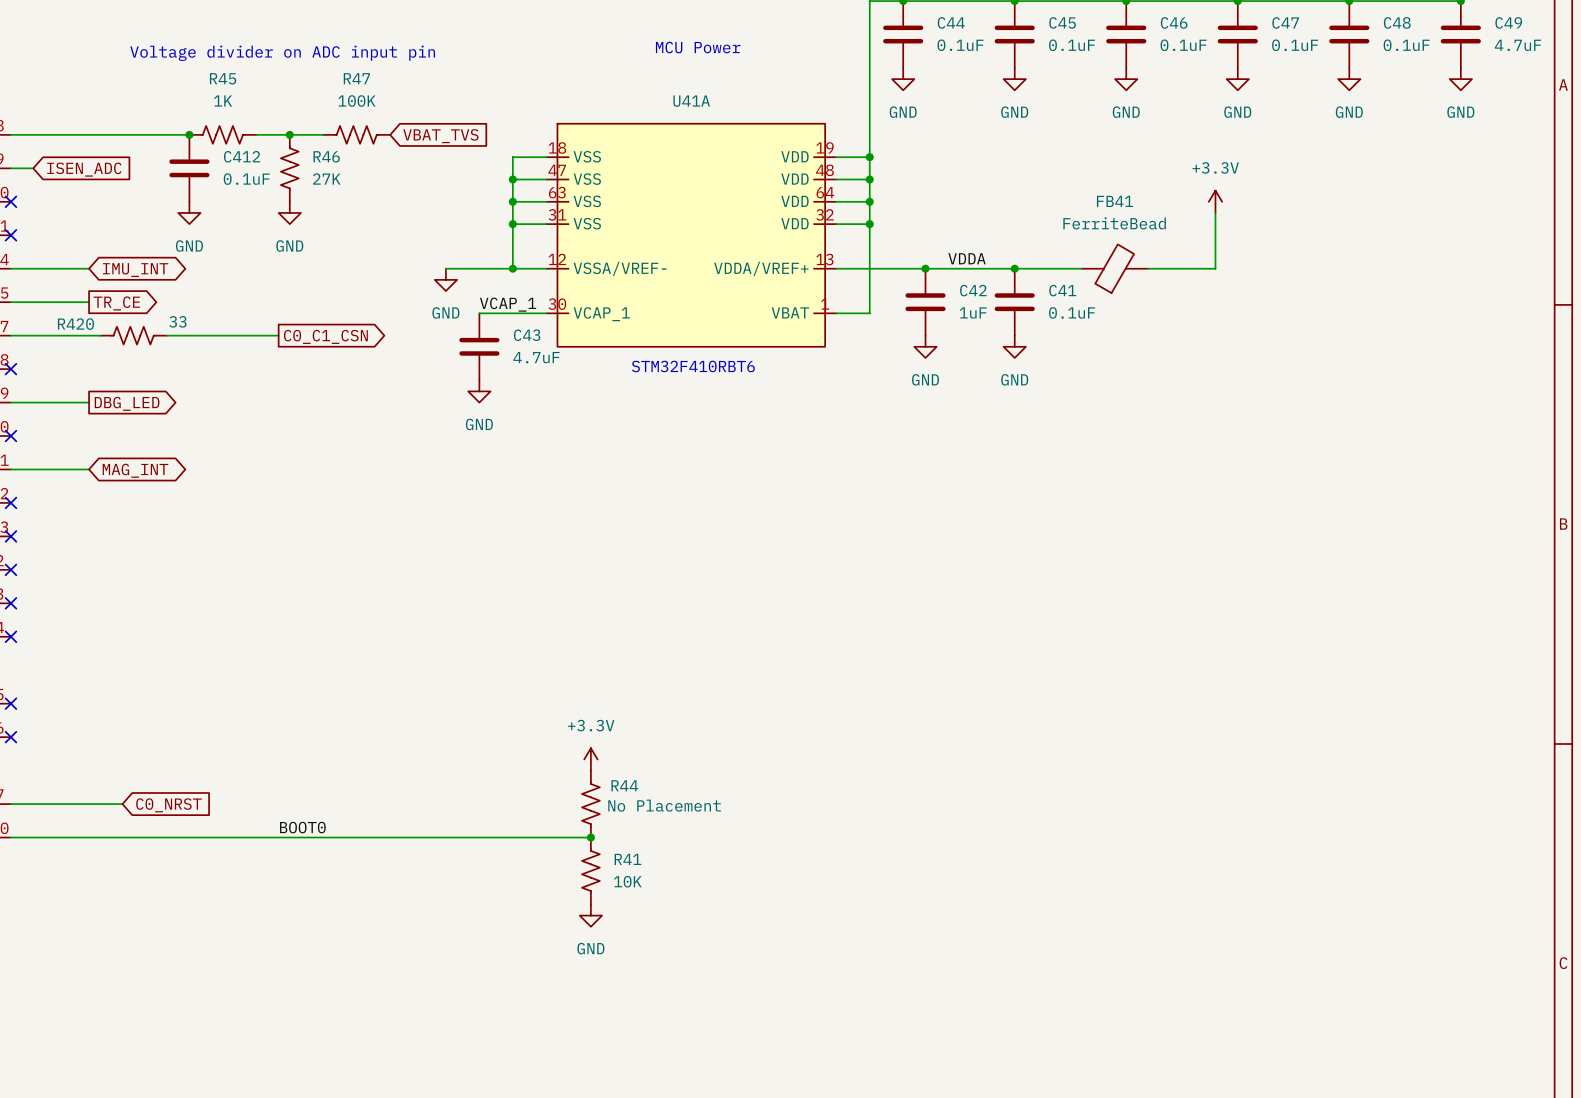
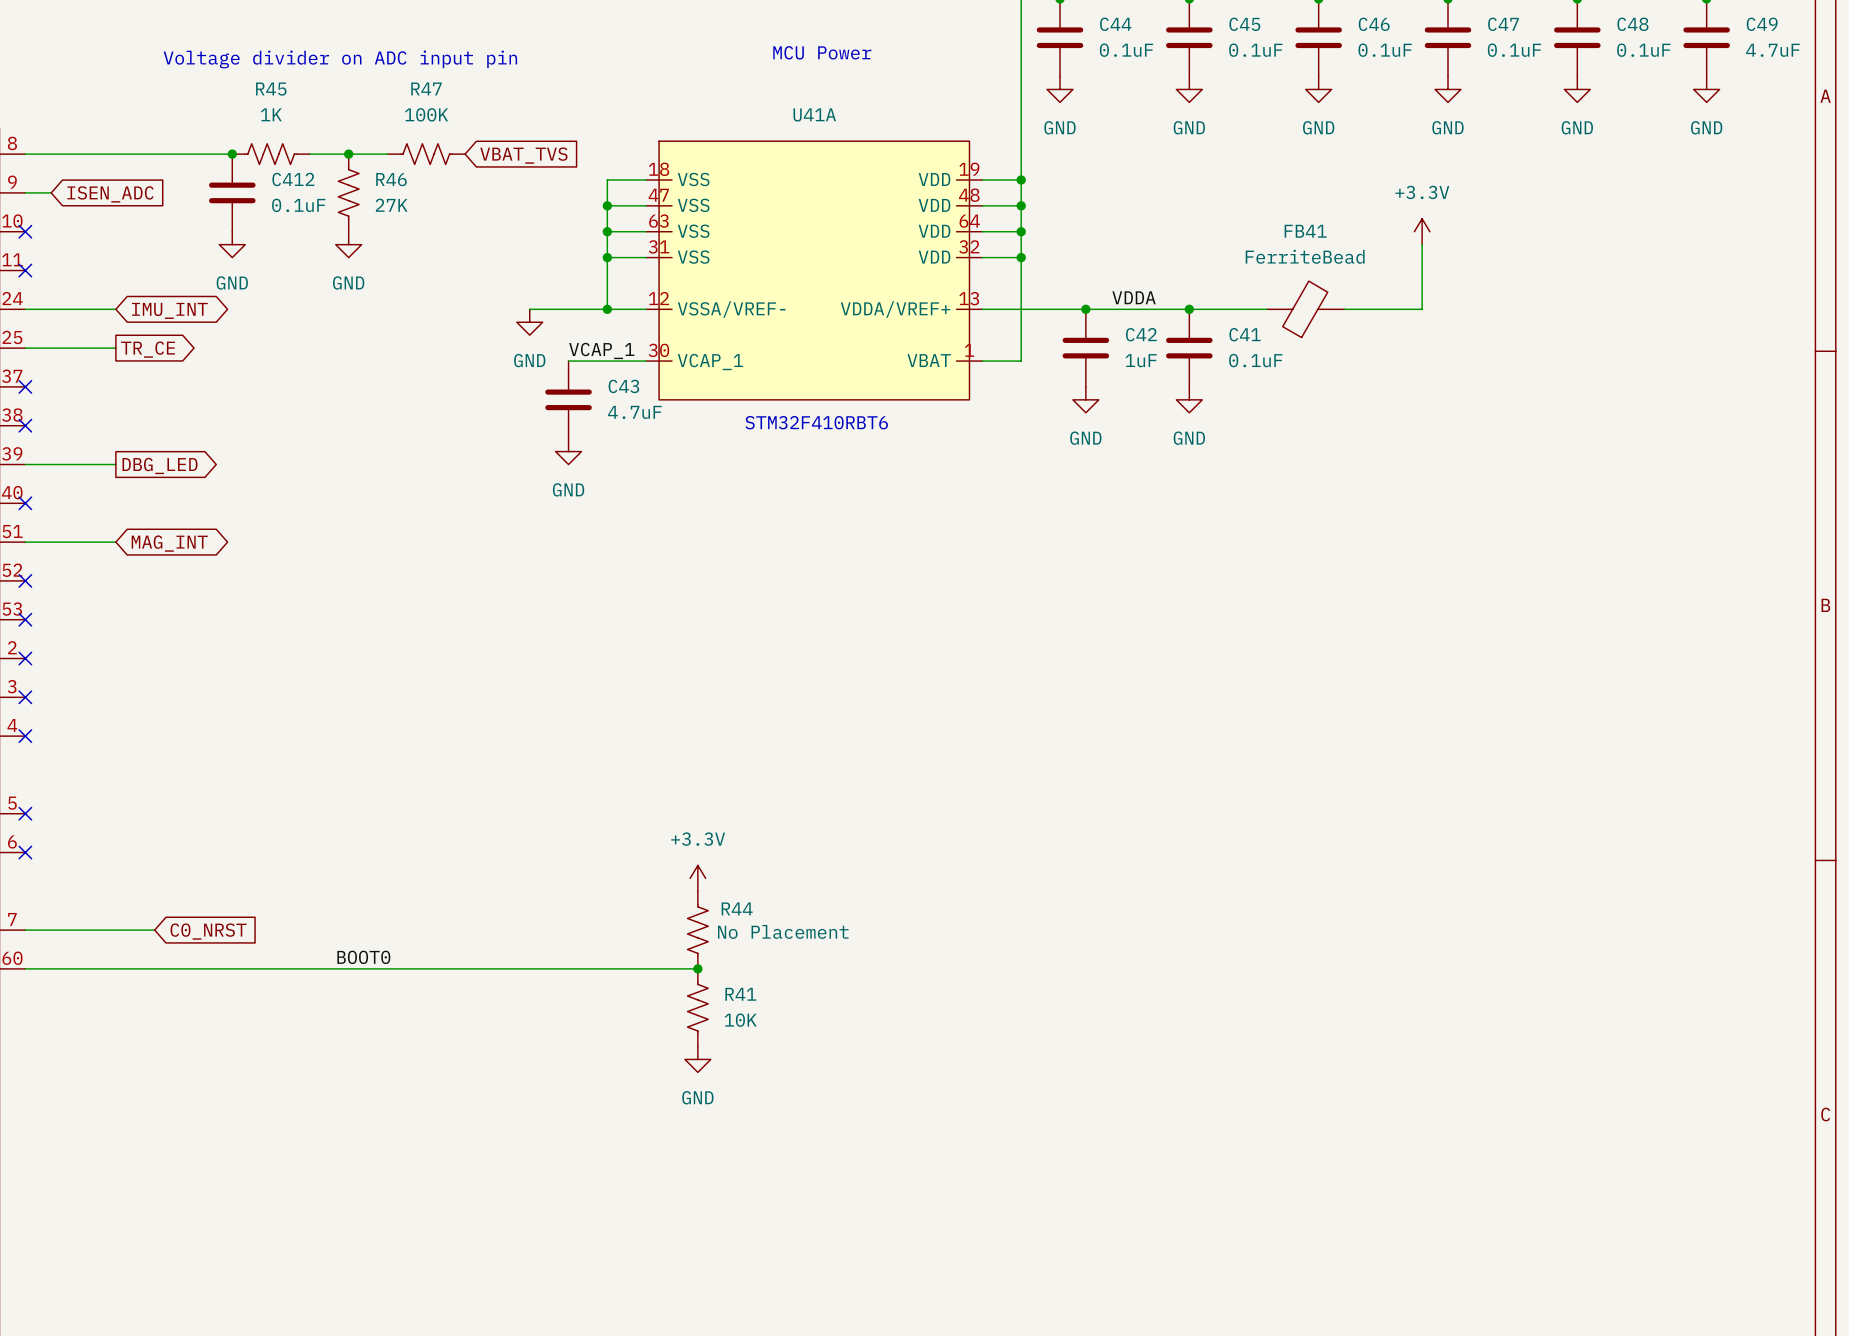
wire: (10, 335) (100, 335) -> none
no-connect mark: none -> (25, 386)
R420: 33 (133, 335) -> none
wire: (167, 335) (278, 335) -> none
global label: C0_C1_CSN (325, 336) -> none

